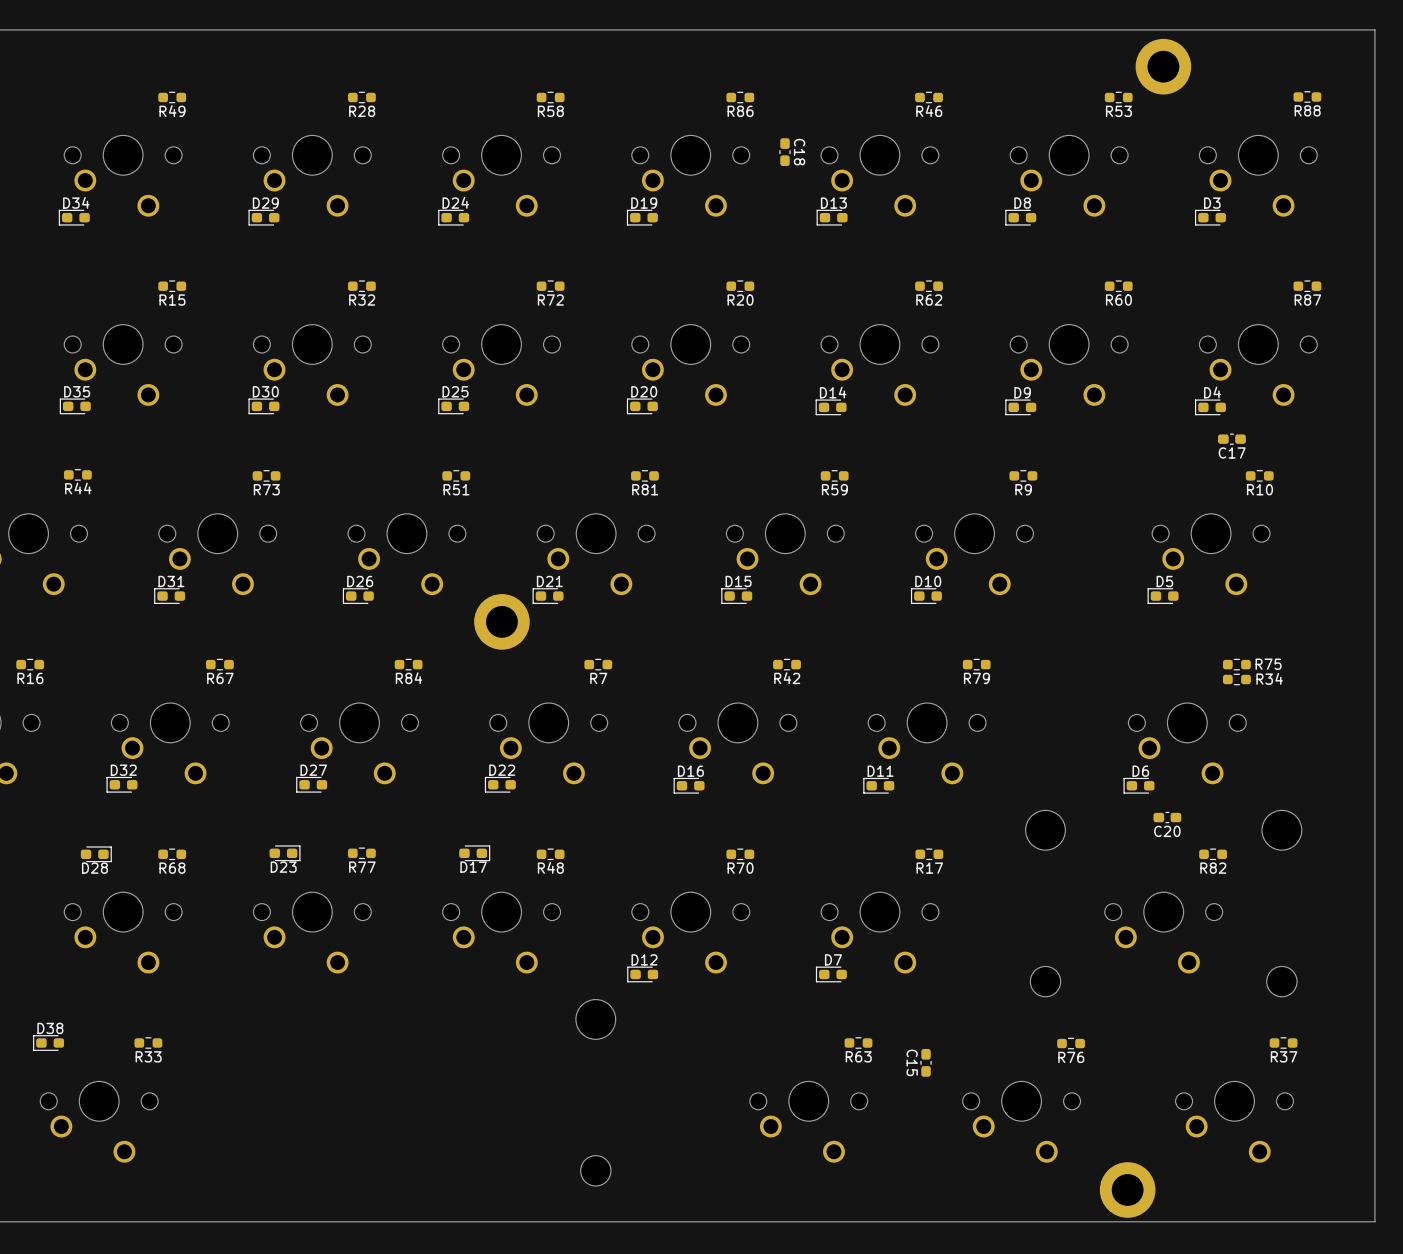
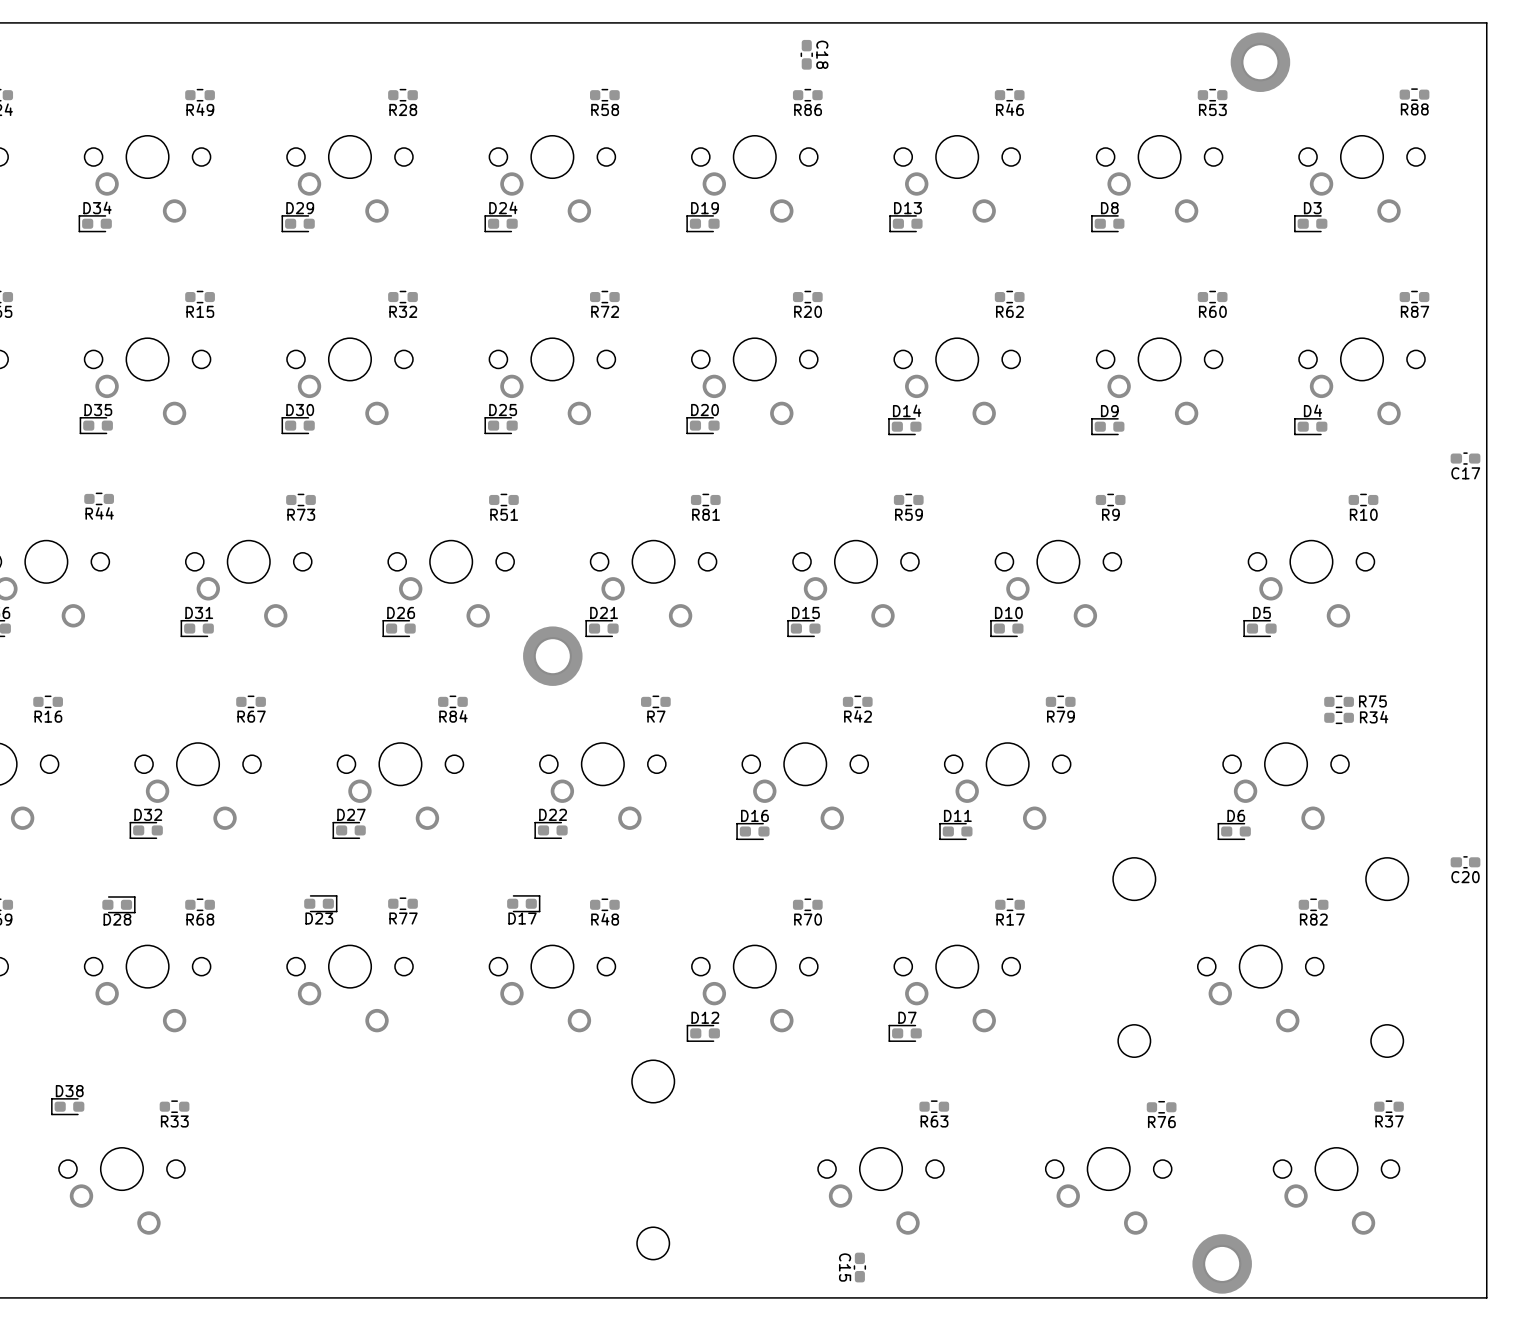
C18 position: (785, 152) -> (806, 54)
C17 position: (1231, 439) -> (1465, 458)
C20 position: (1167, 817) -> (1465, 862)
C15 position: (926, 1062) -> (859, 1267)

